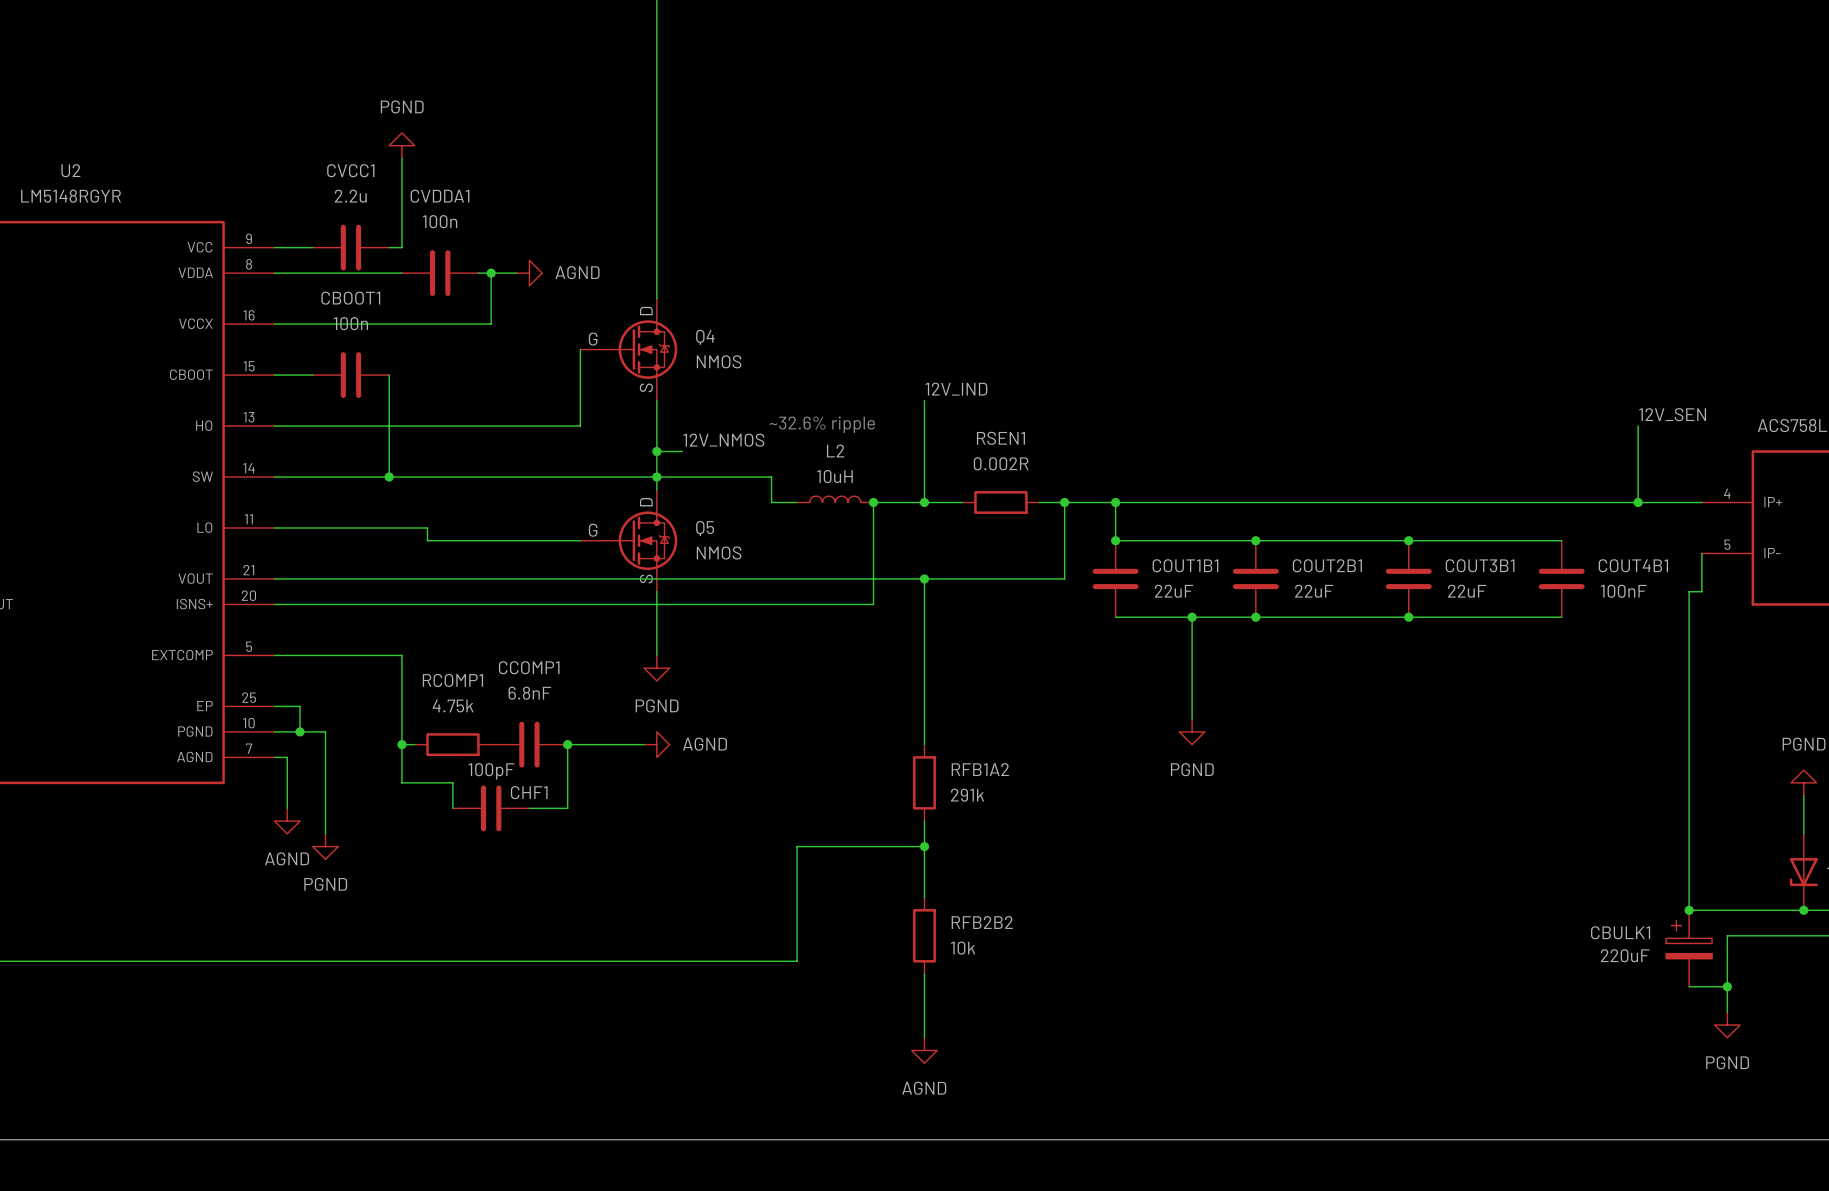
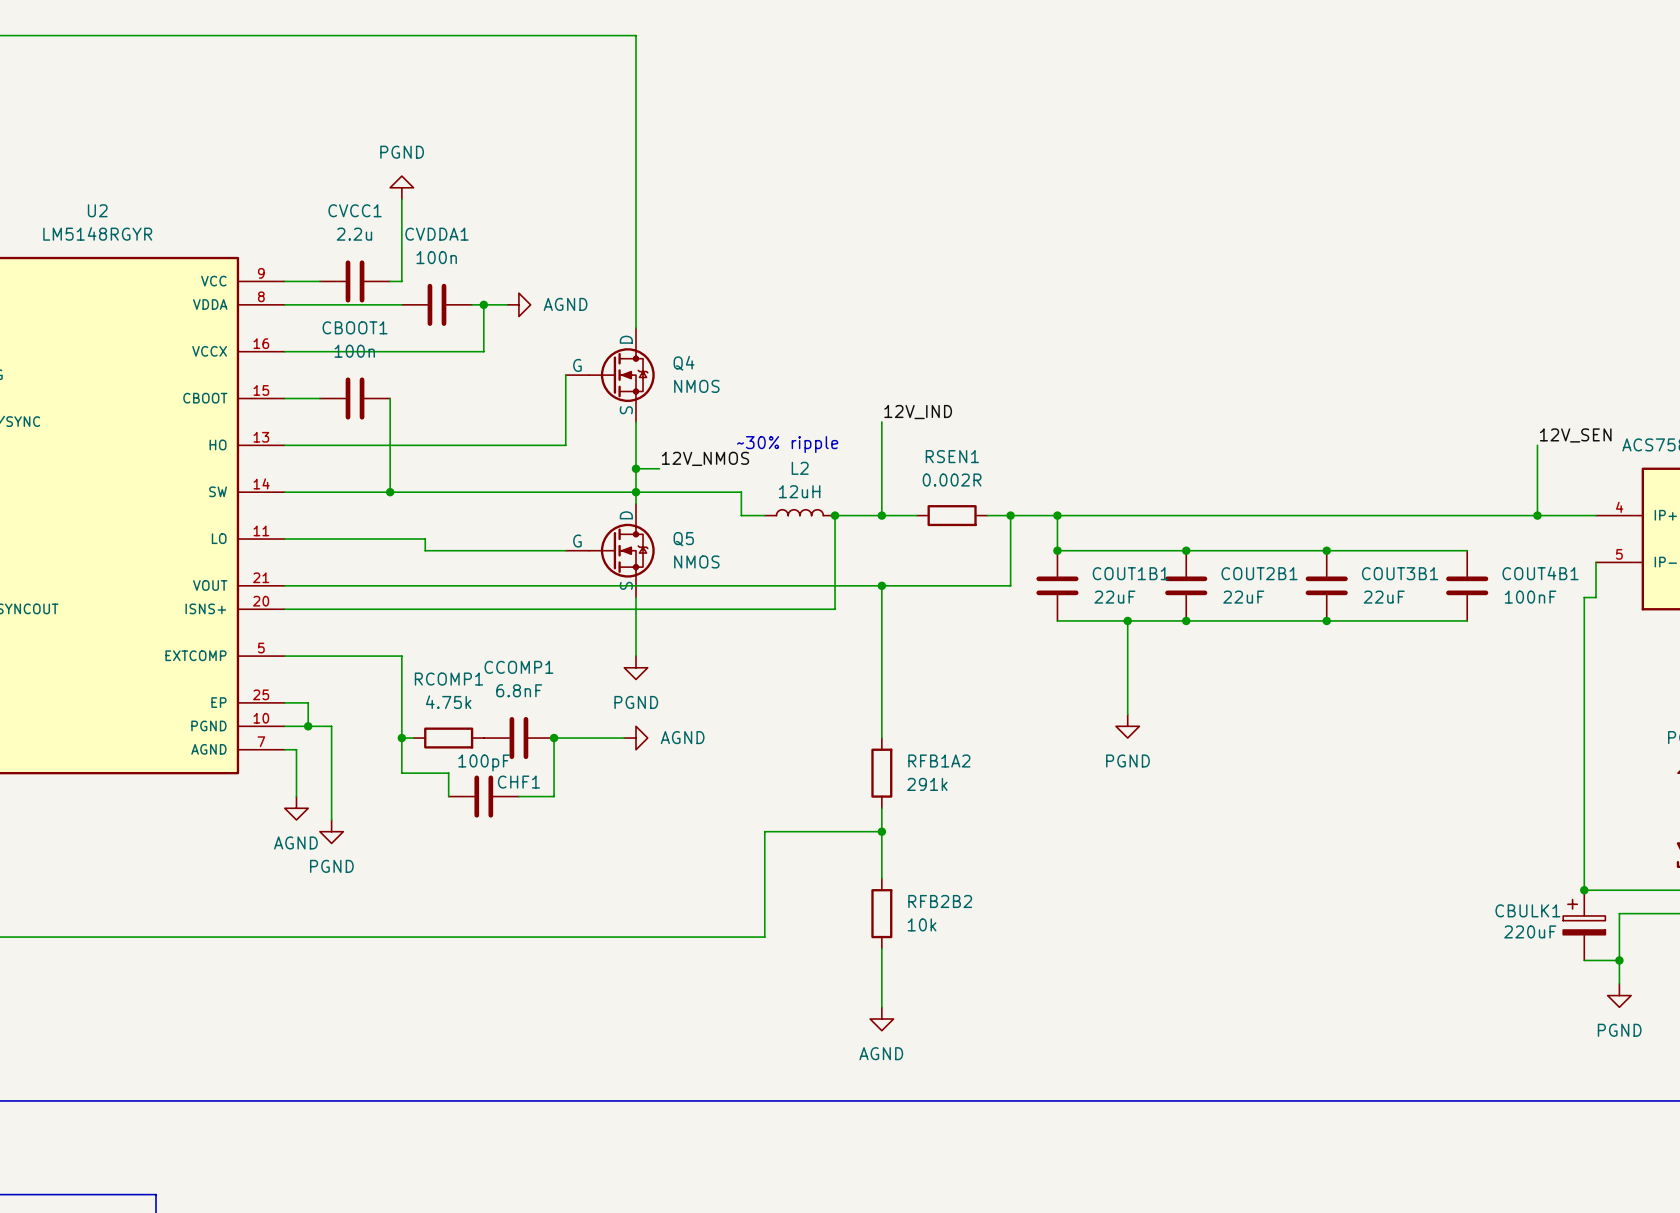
text: ~32.6% ripple (822, 424) -> ~30% ripple (787, 444)
L2 value: 10uH (834, 476) -> 12uH (799, 491)

